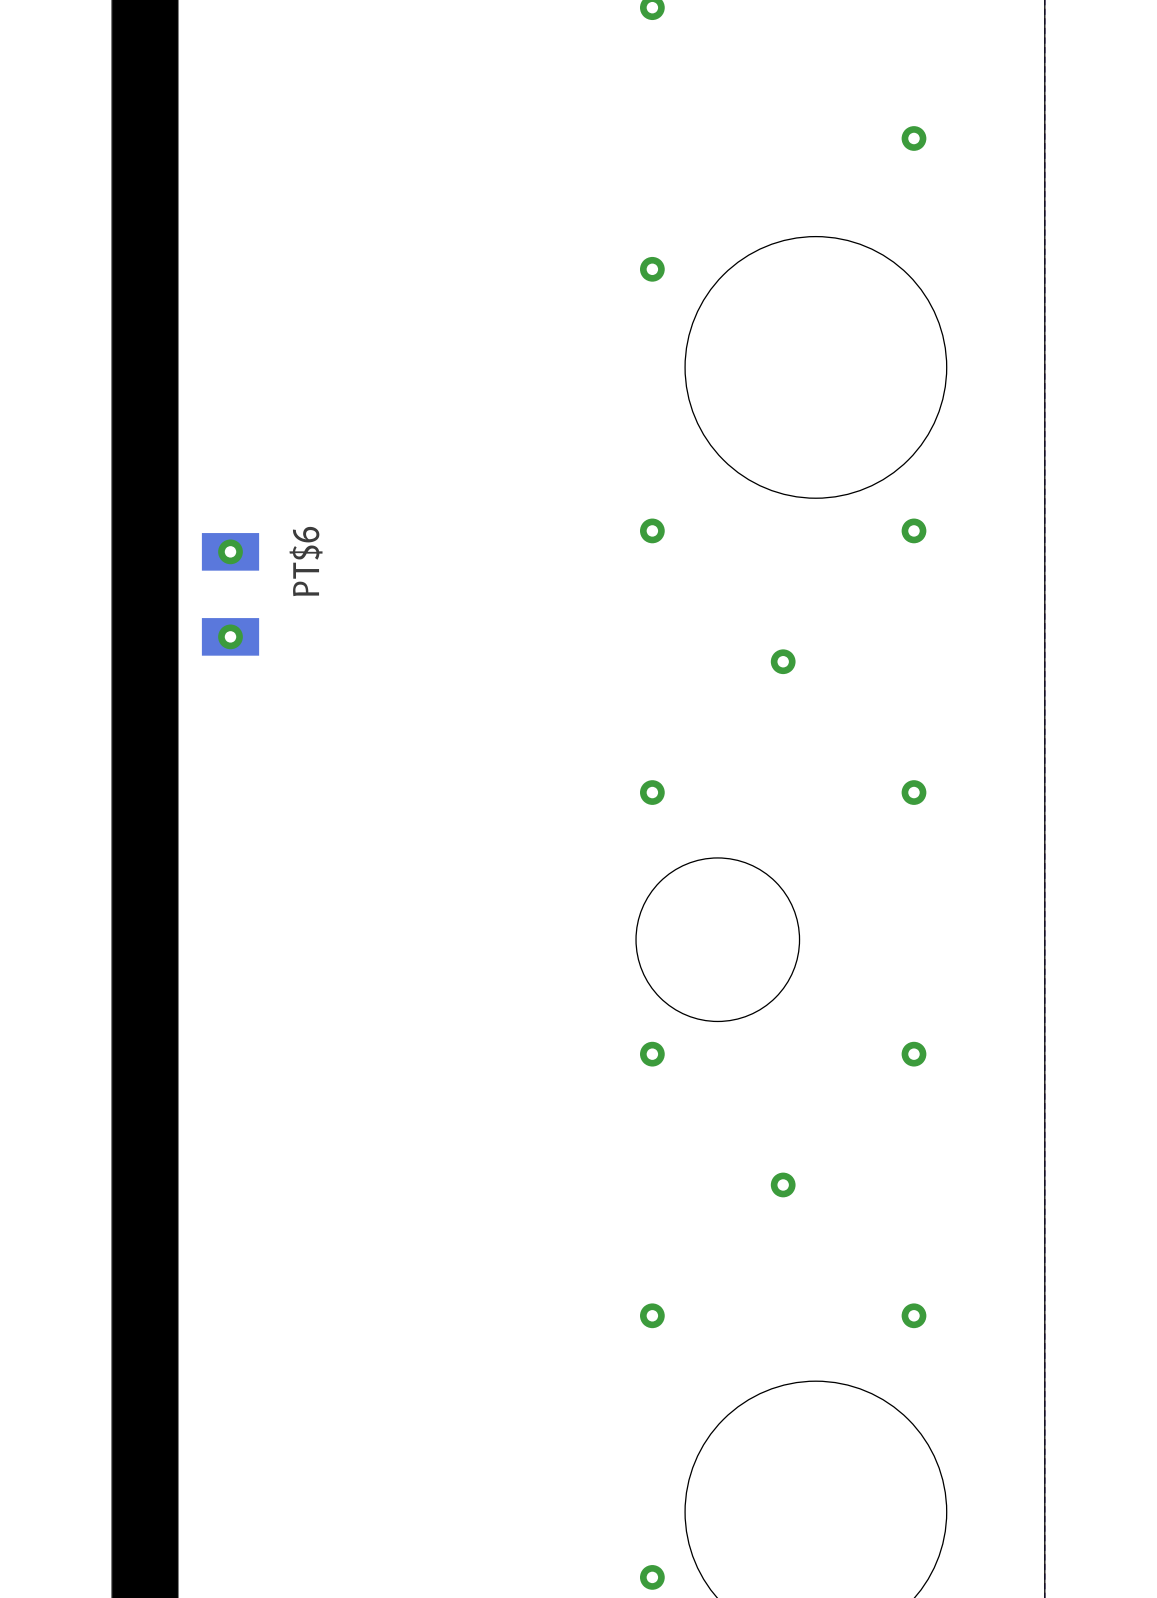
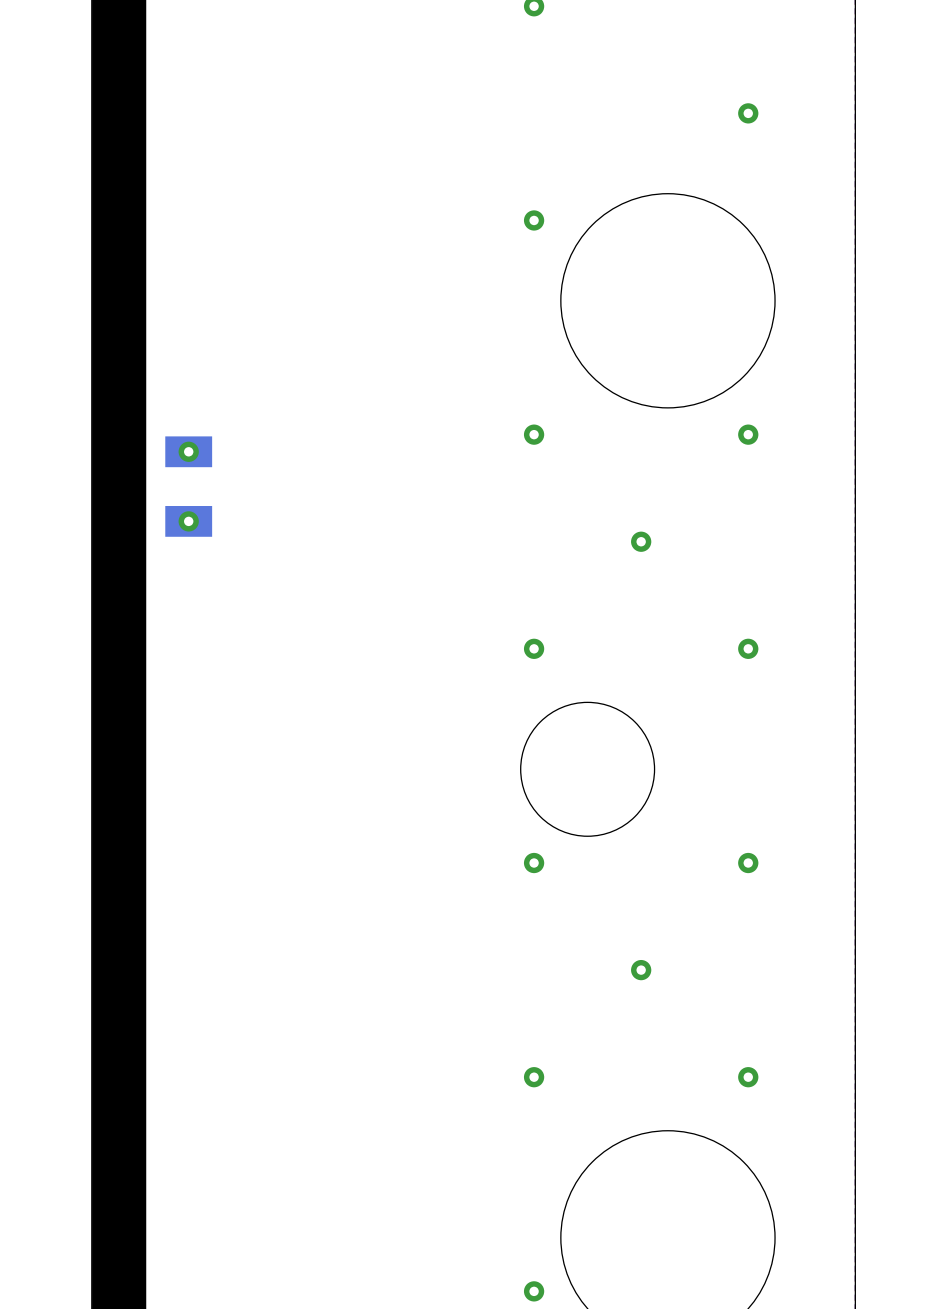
PT$6 name: PT$6 (305, 561) -> none

